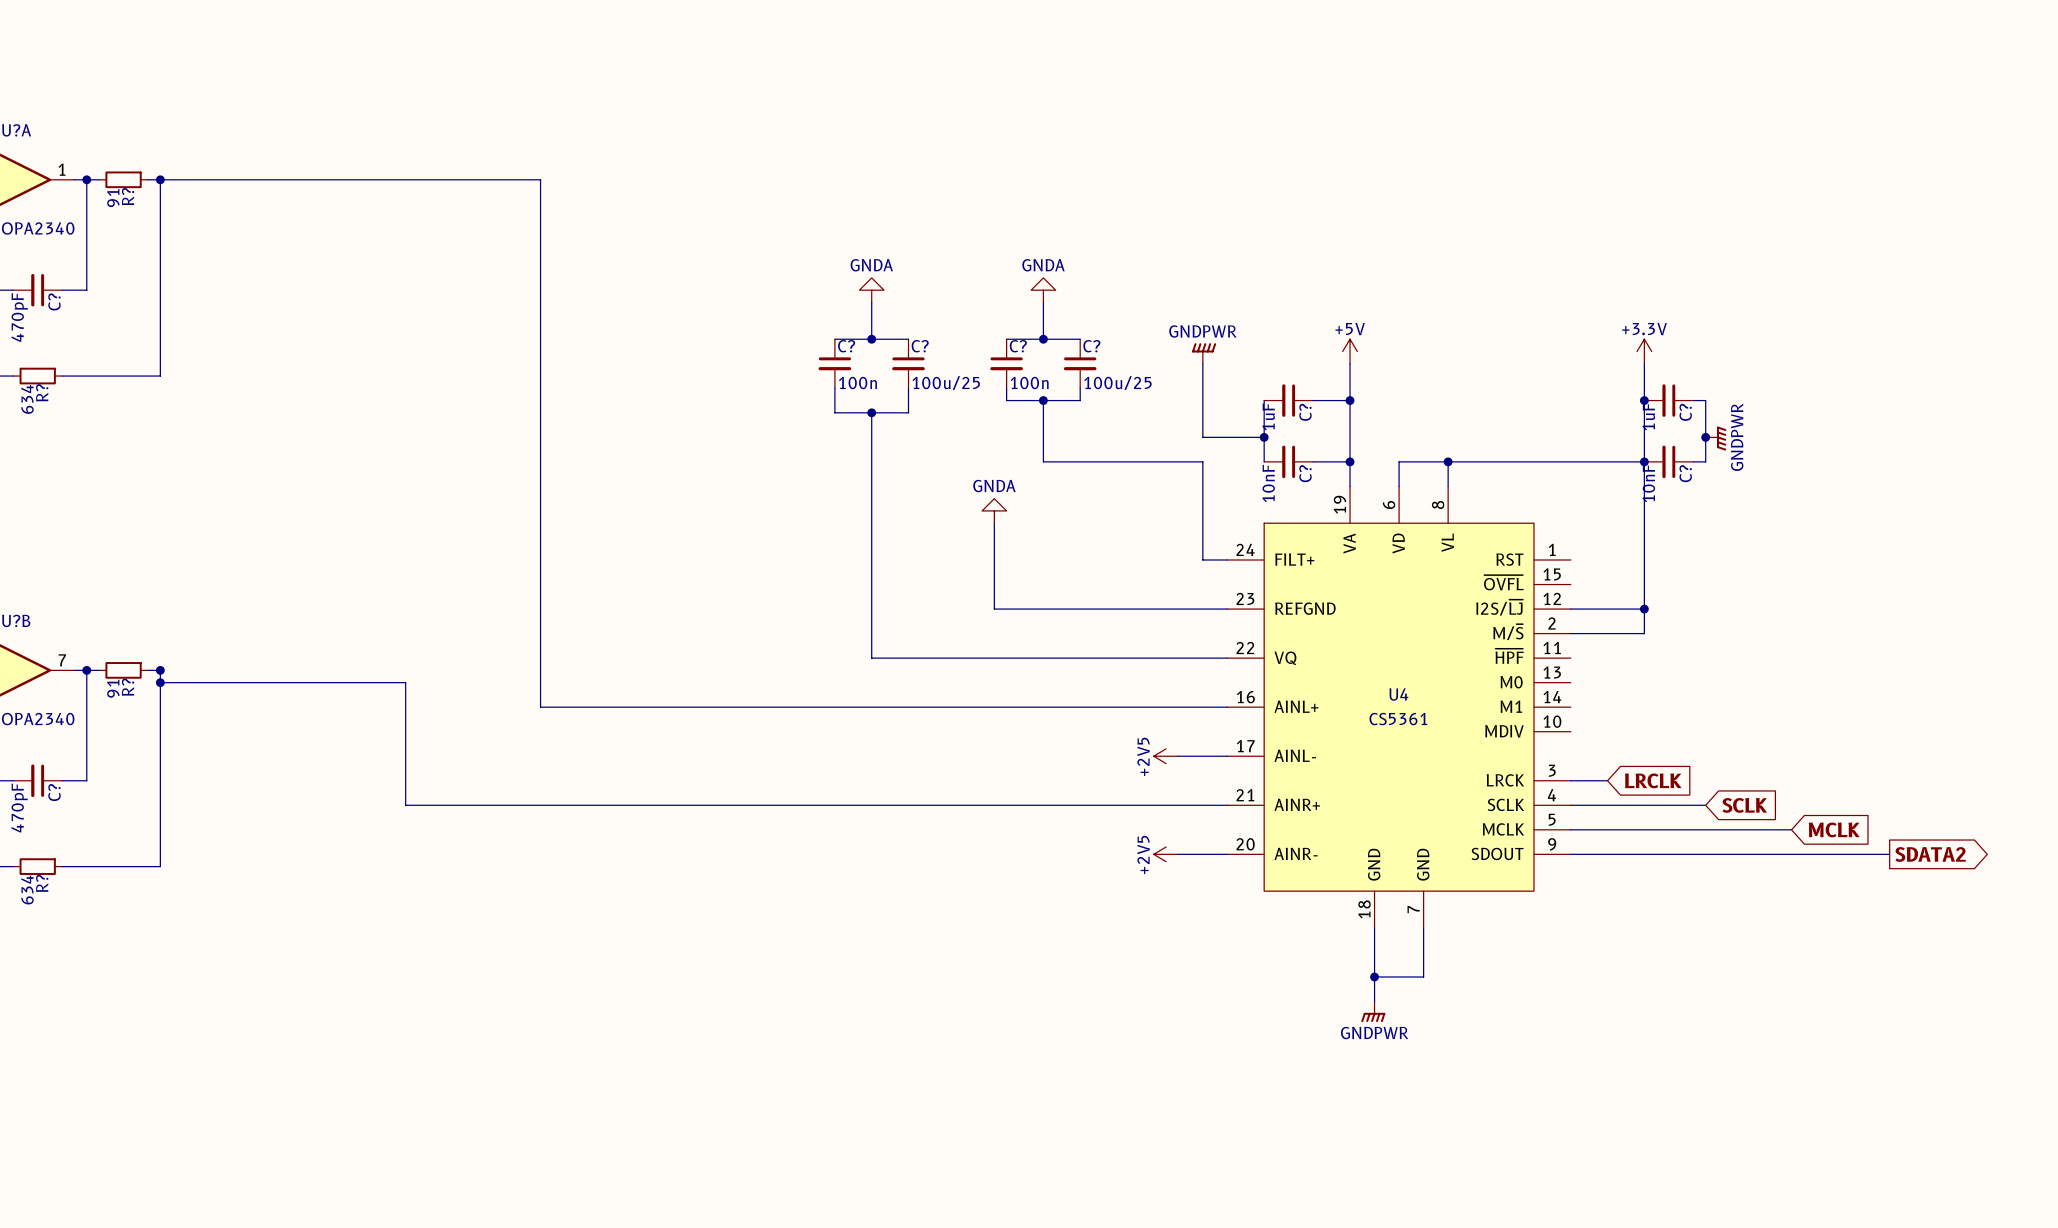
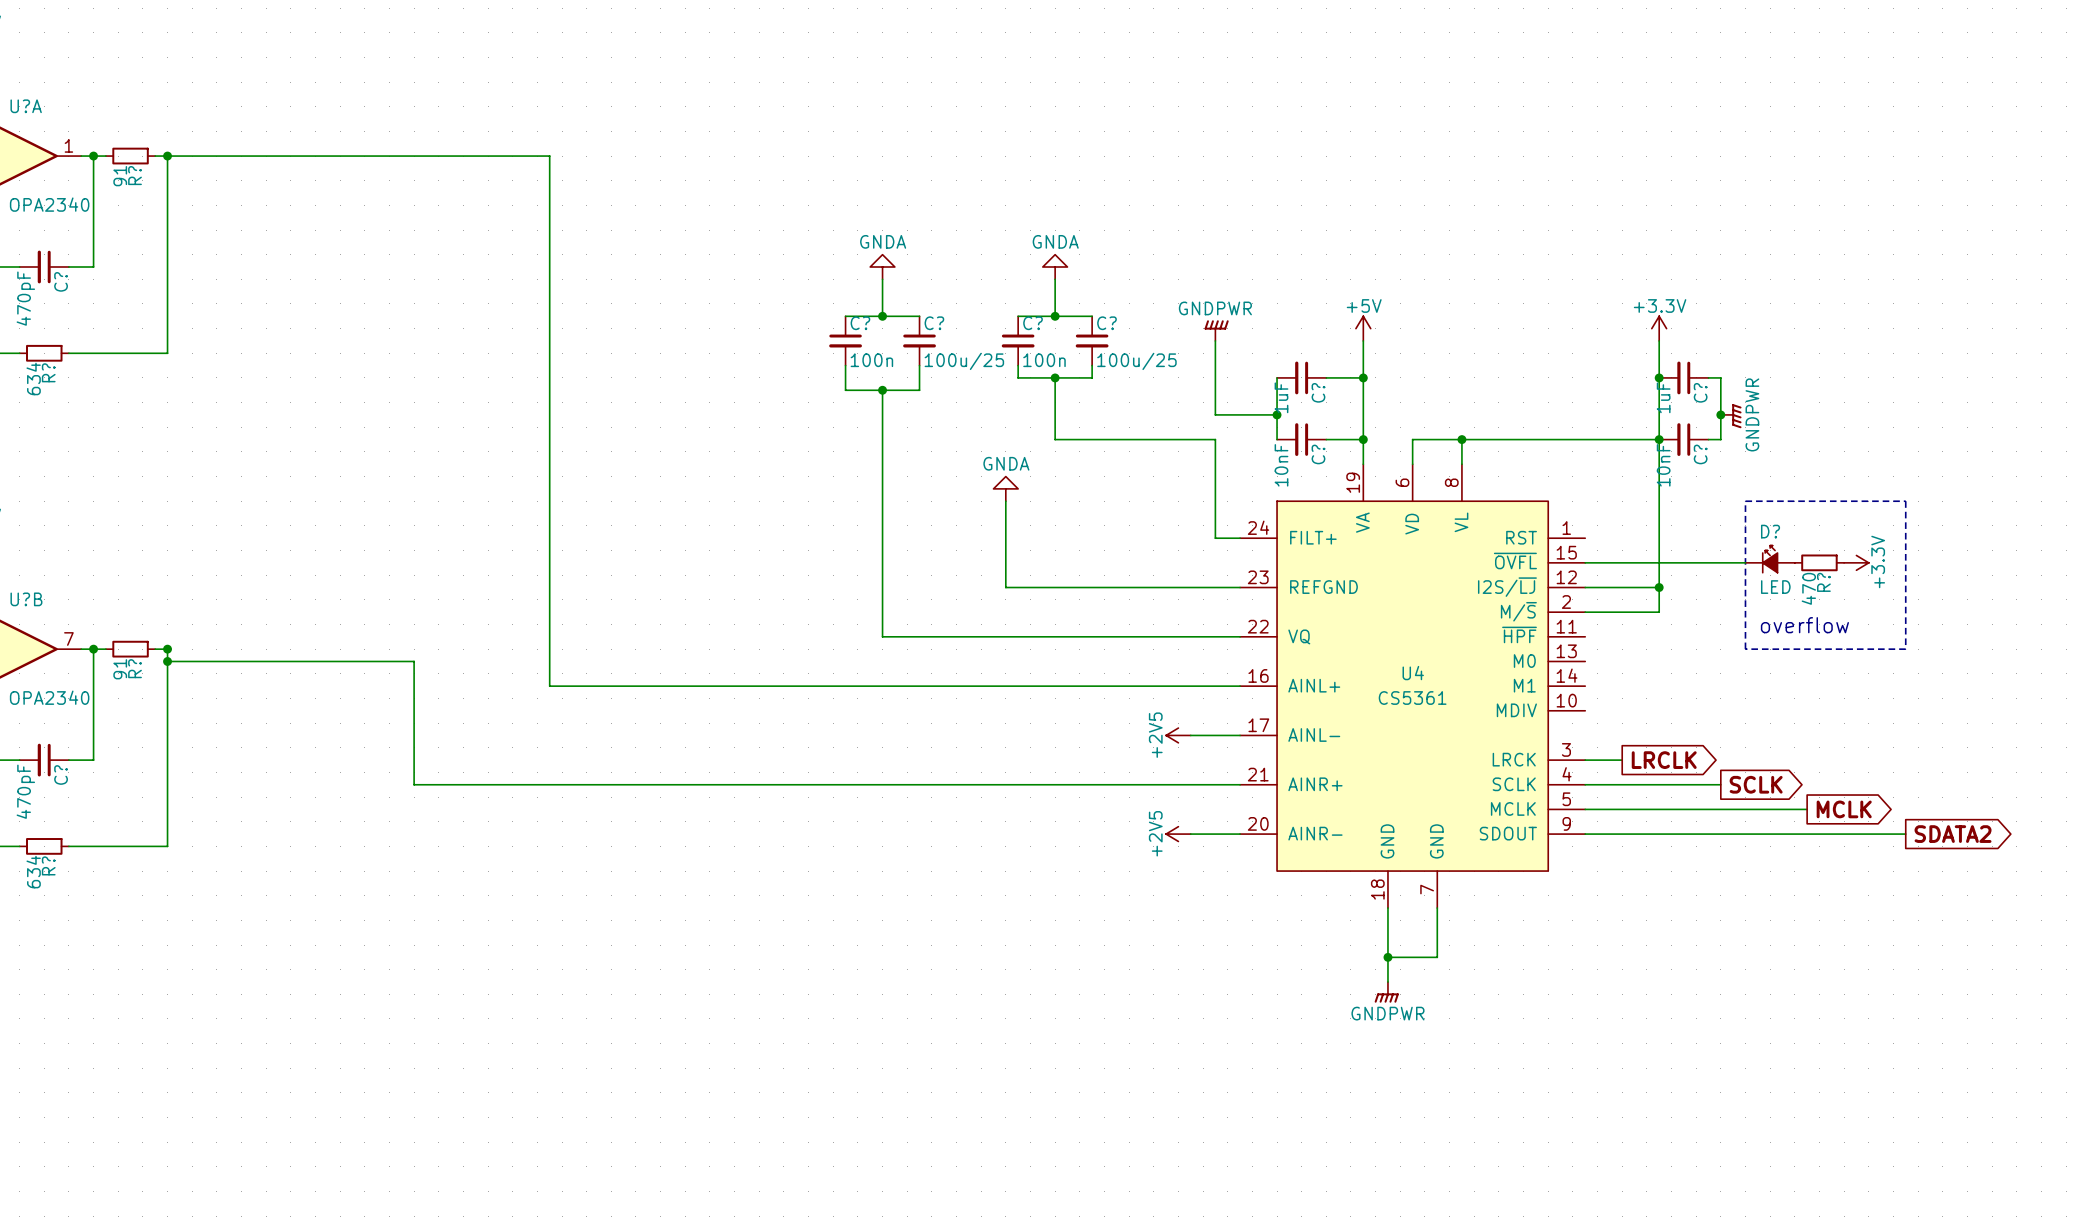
line: none -> (1745, 501) (1905, 501) (1905, 649) (1745, 649) (1745, 501)
D?: none -> LED (1770, 559)
wire: none -> (1585, 562) (1745, 562)
R?: none -> 470 (1819, 562)
power symbol: none -> +3.3V (1856, 562)
text: none -> overflow (1804, 625)
global label shape: input (1653, 780) -> output (1664, 760)
global label shape: input (1744, 805) -> output (1756, 784)
global label shape: input (1834, 829) -> output (1844, 809)

